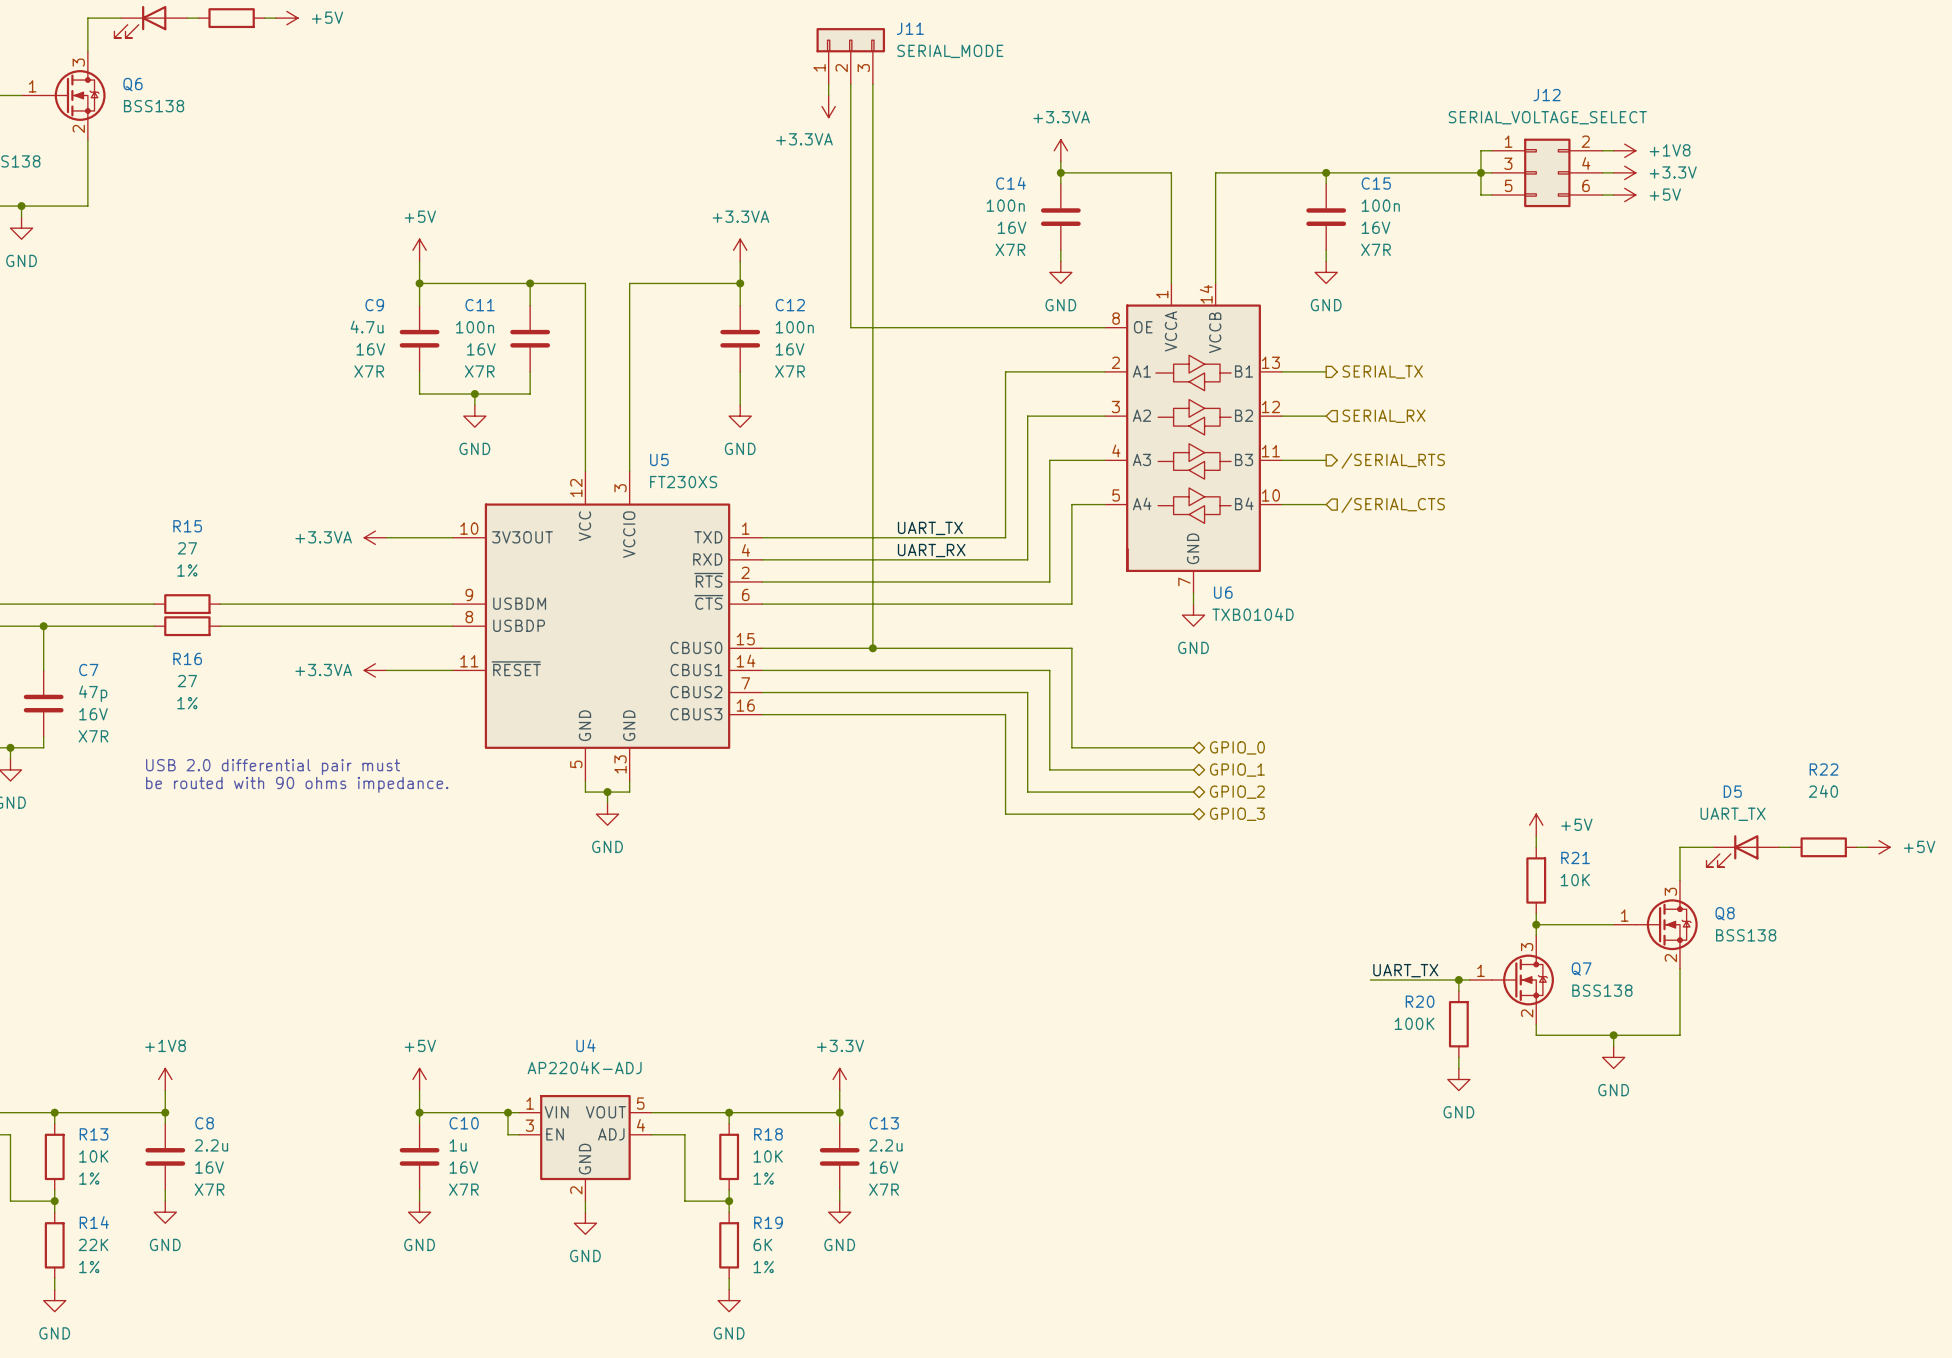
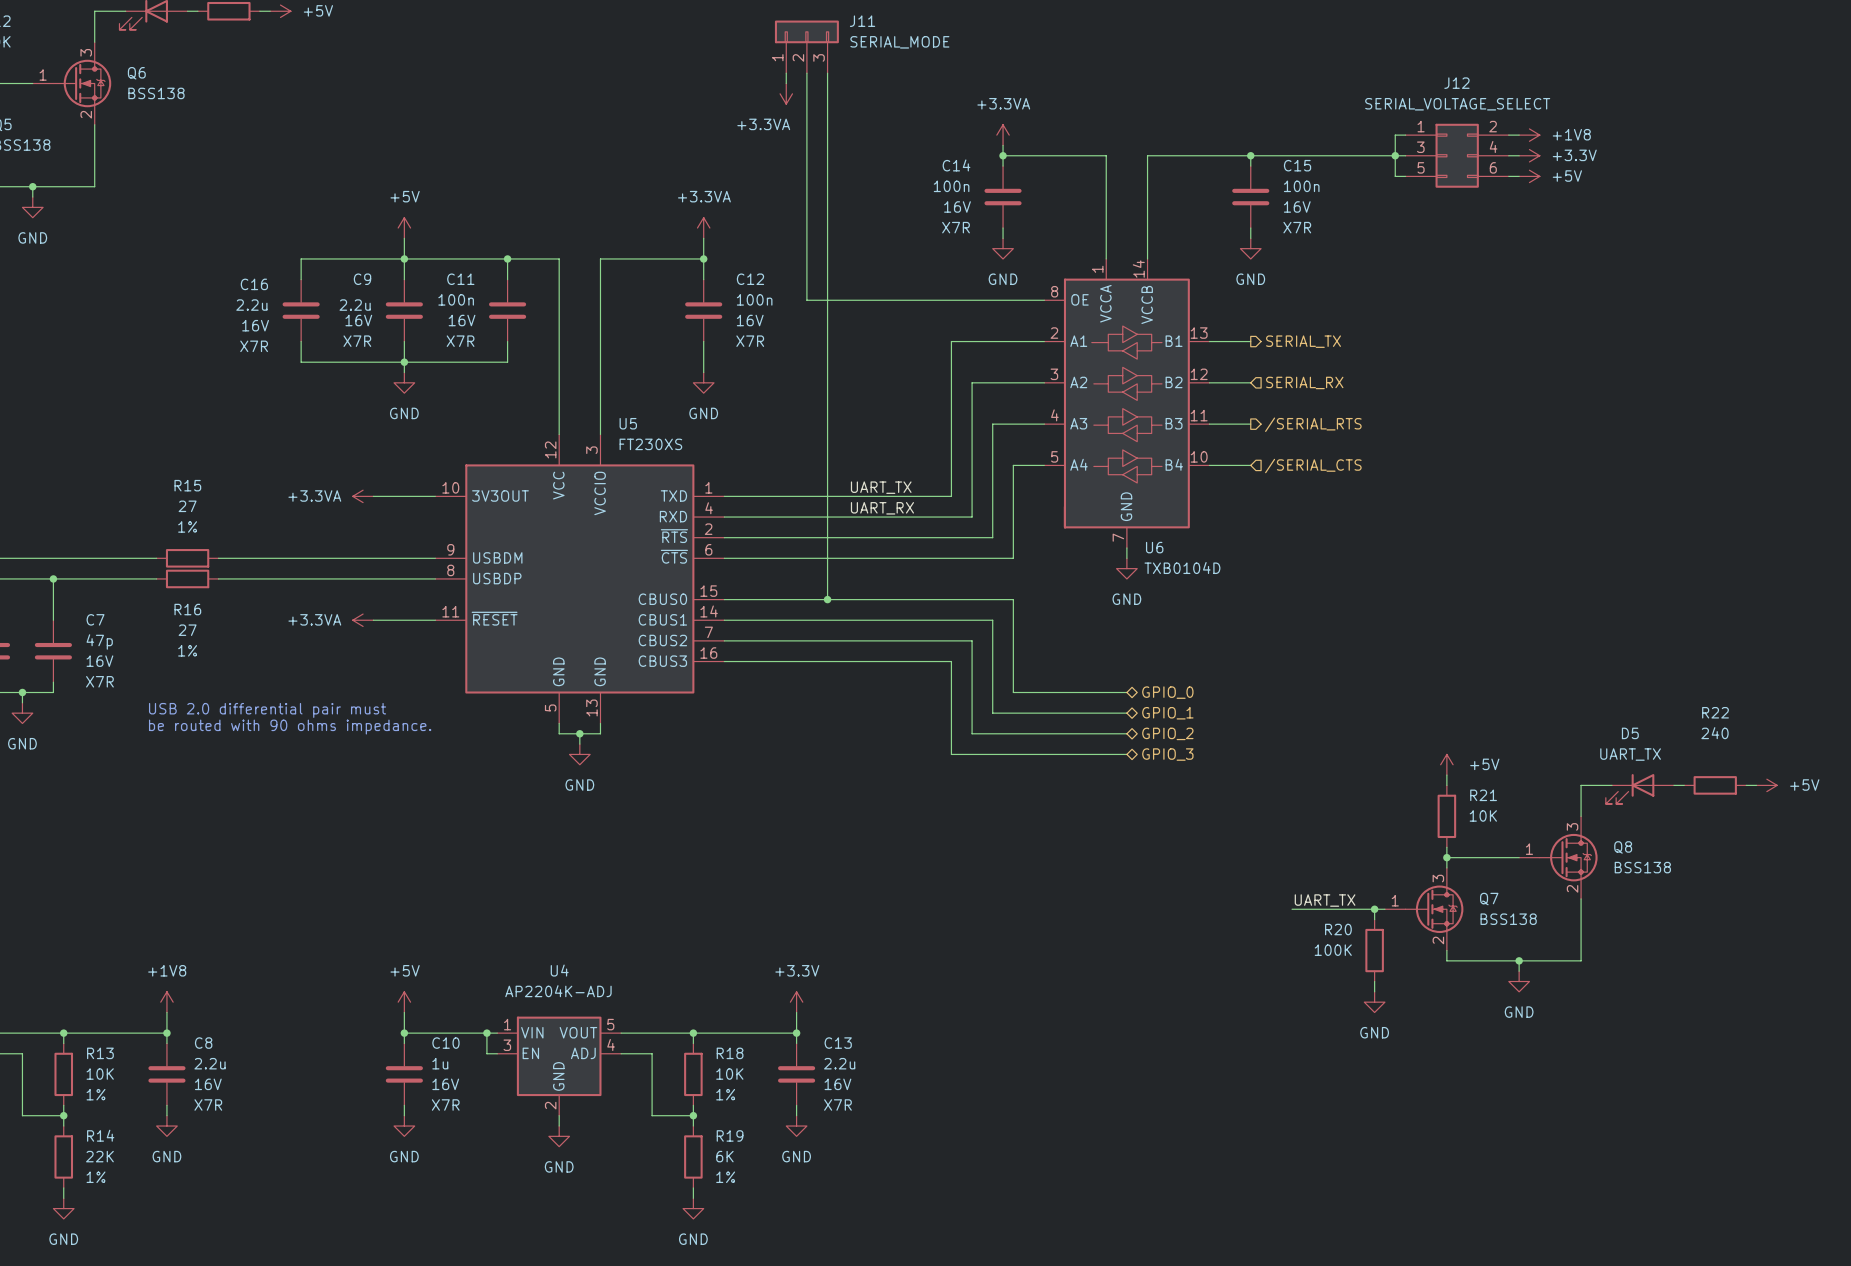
wire: none -> (404, 258) (301, 258) (301, 279)
C9 value: 4.7u (367, 327) -> 2.2u (355, 305)
C16: none -> 2.2u (301, 310)
wire: none -> (301, 341) (301, 362) (404, 362) (404, 372)
junction: none -> (404, 362)
wire: (474, 394) (474, 405) -> none
junction: (474, 394) -> none
power symbol position: GND (474, 416) -> GND (404, 382)

